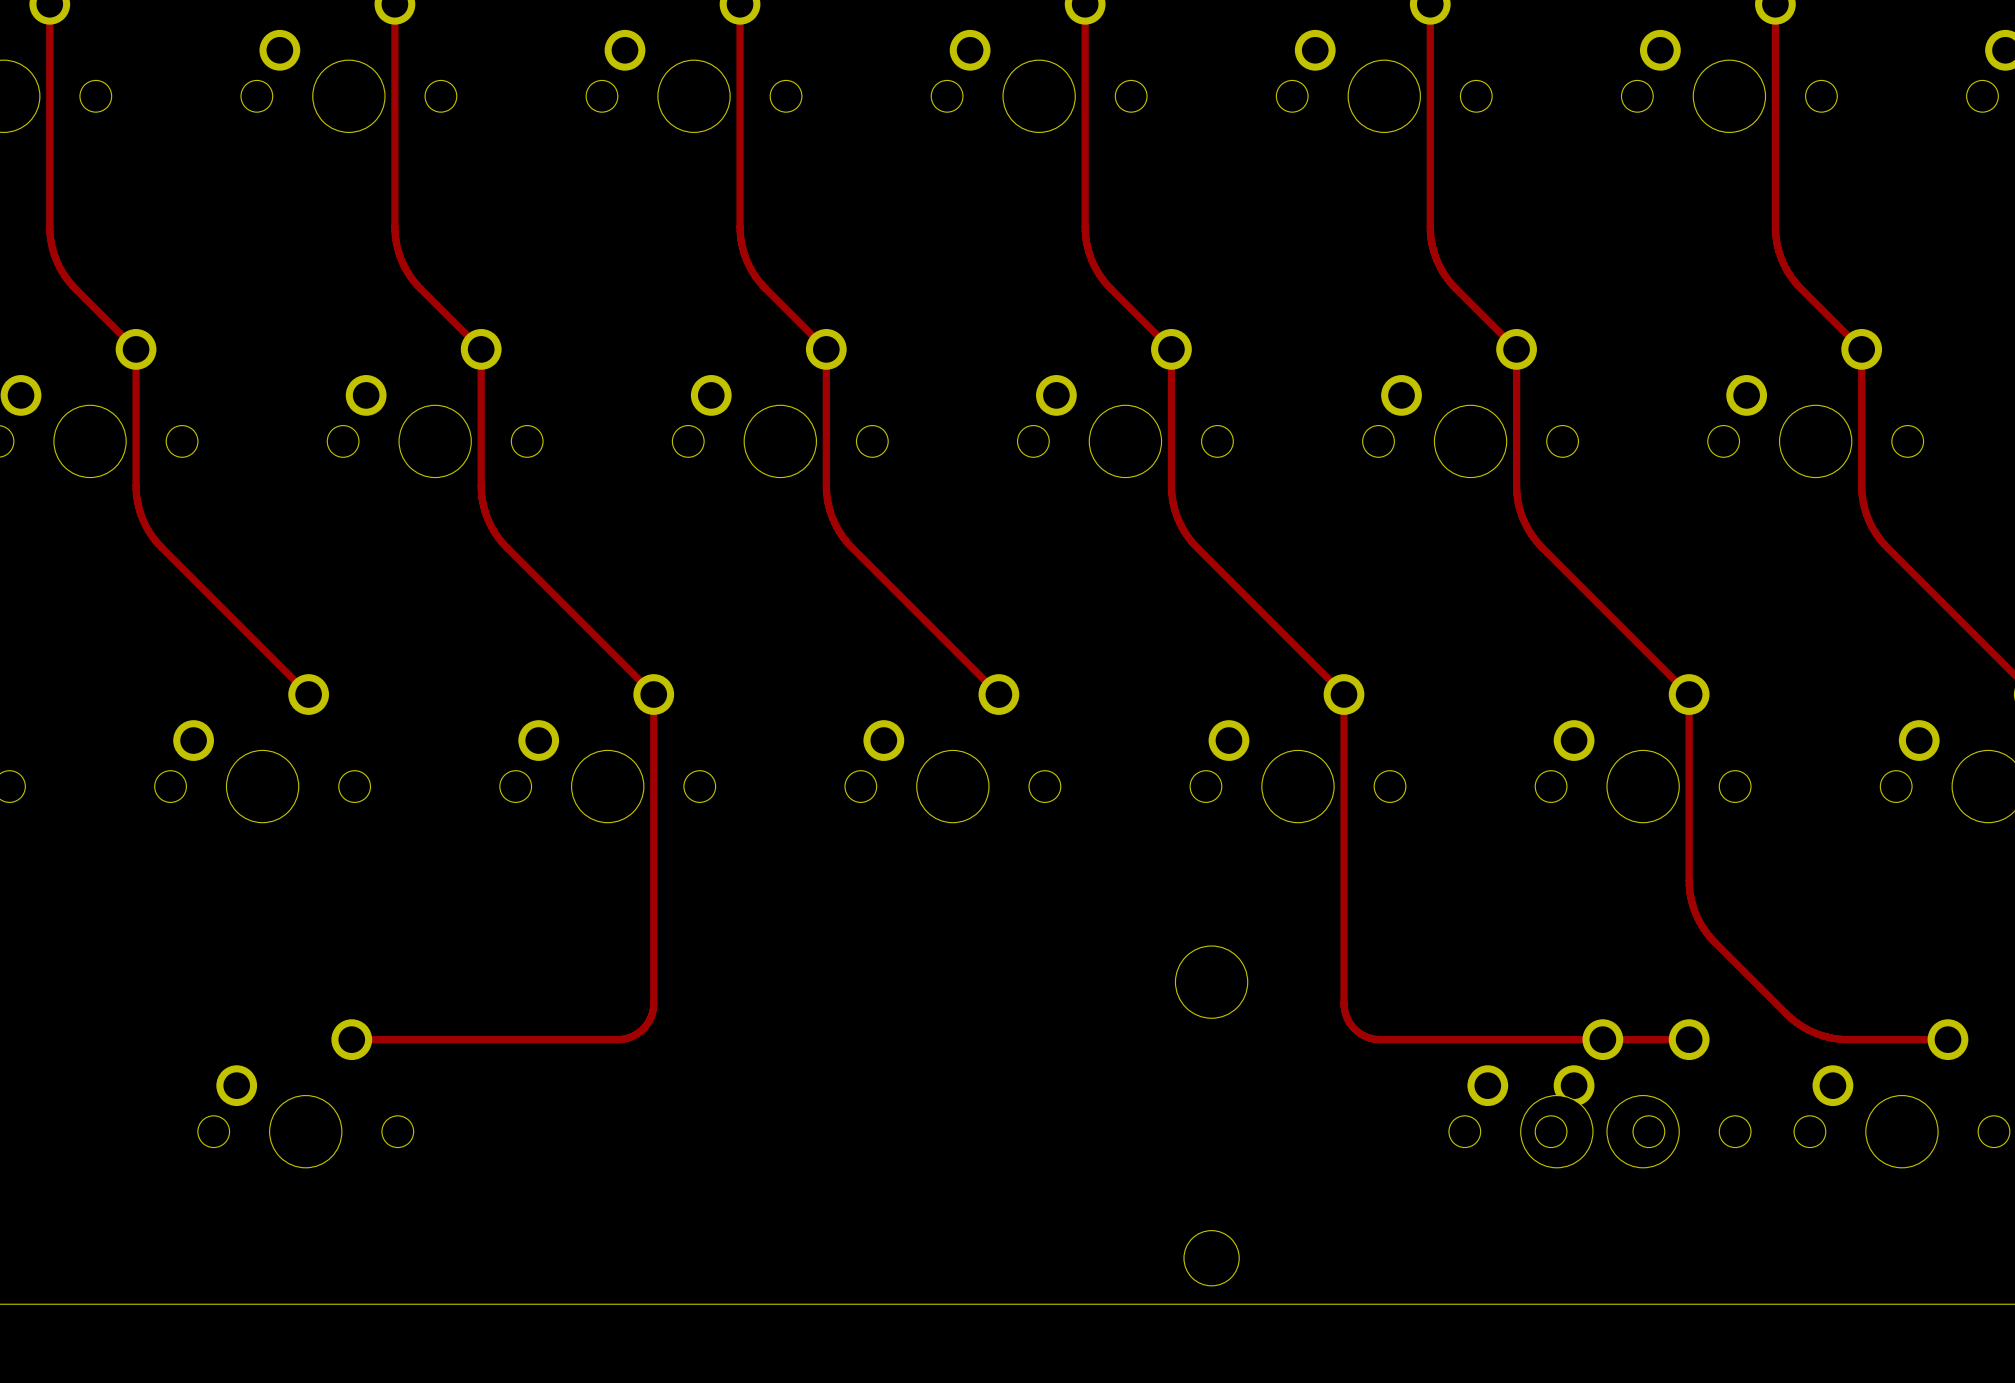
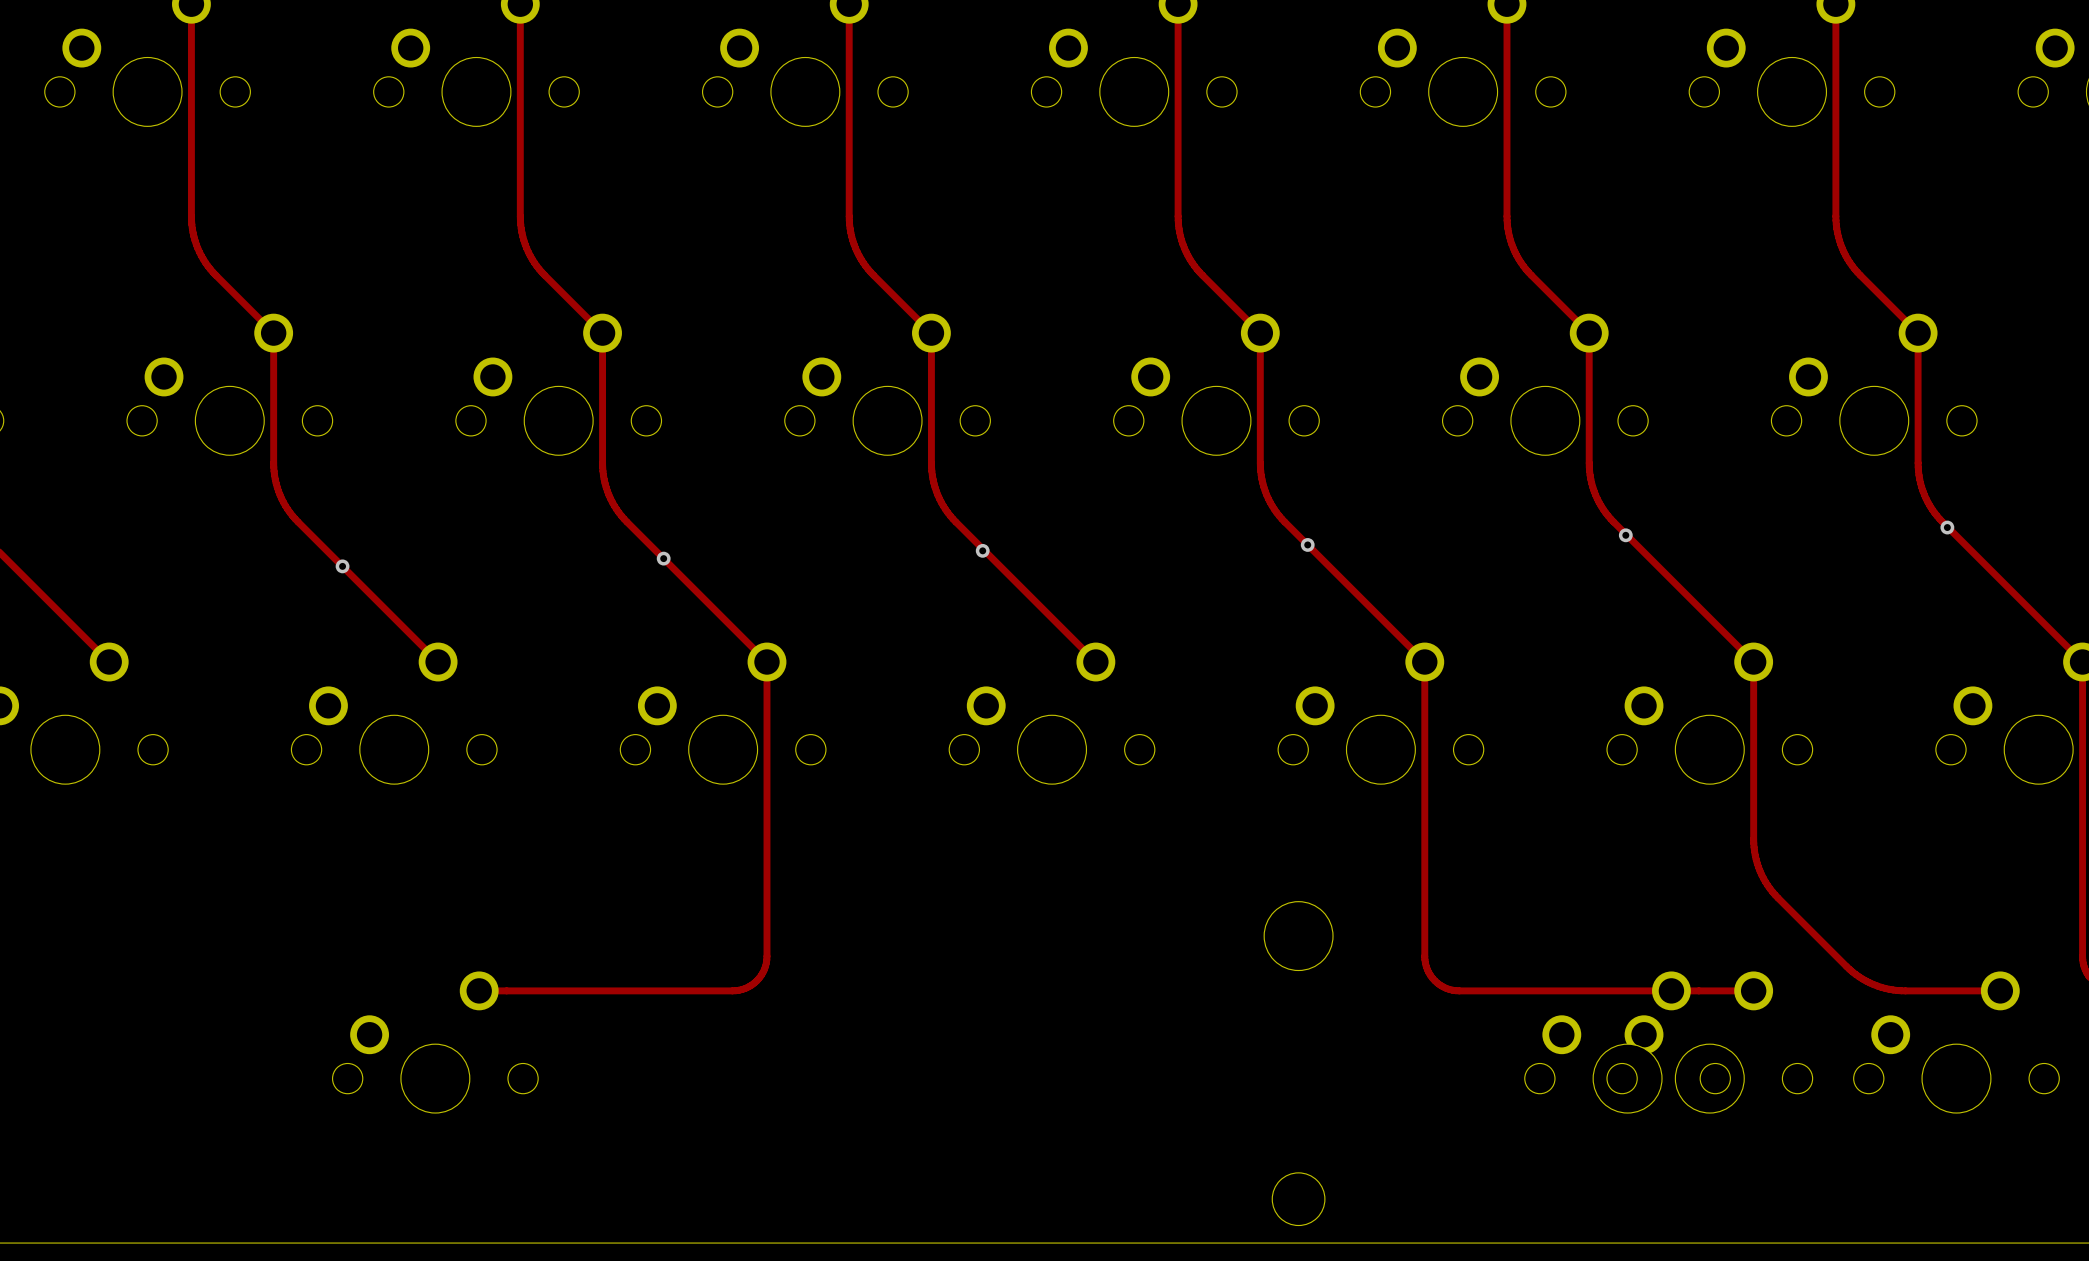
via: none -> (1947, 527)
via: none -> (1625, 535)
via: none -> (1307, 544)
via: none -> (982, 550)
via: none -> (663, 558)
via: none -> (342, 566)

